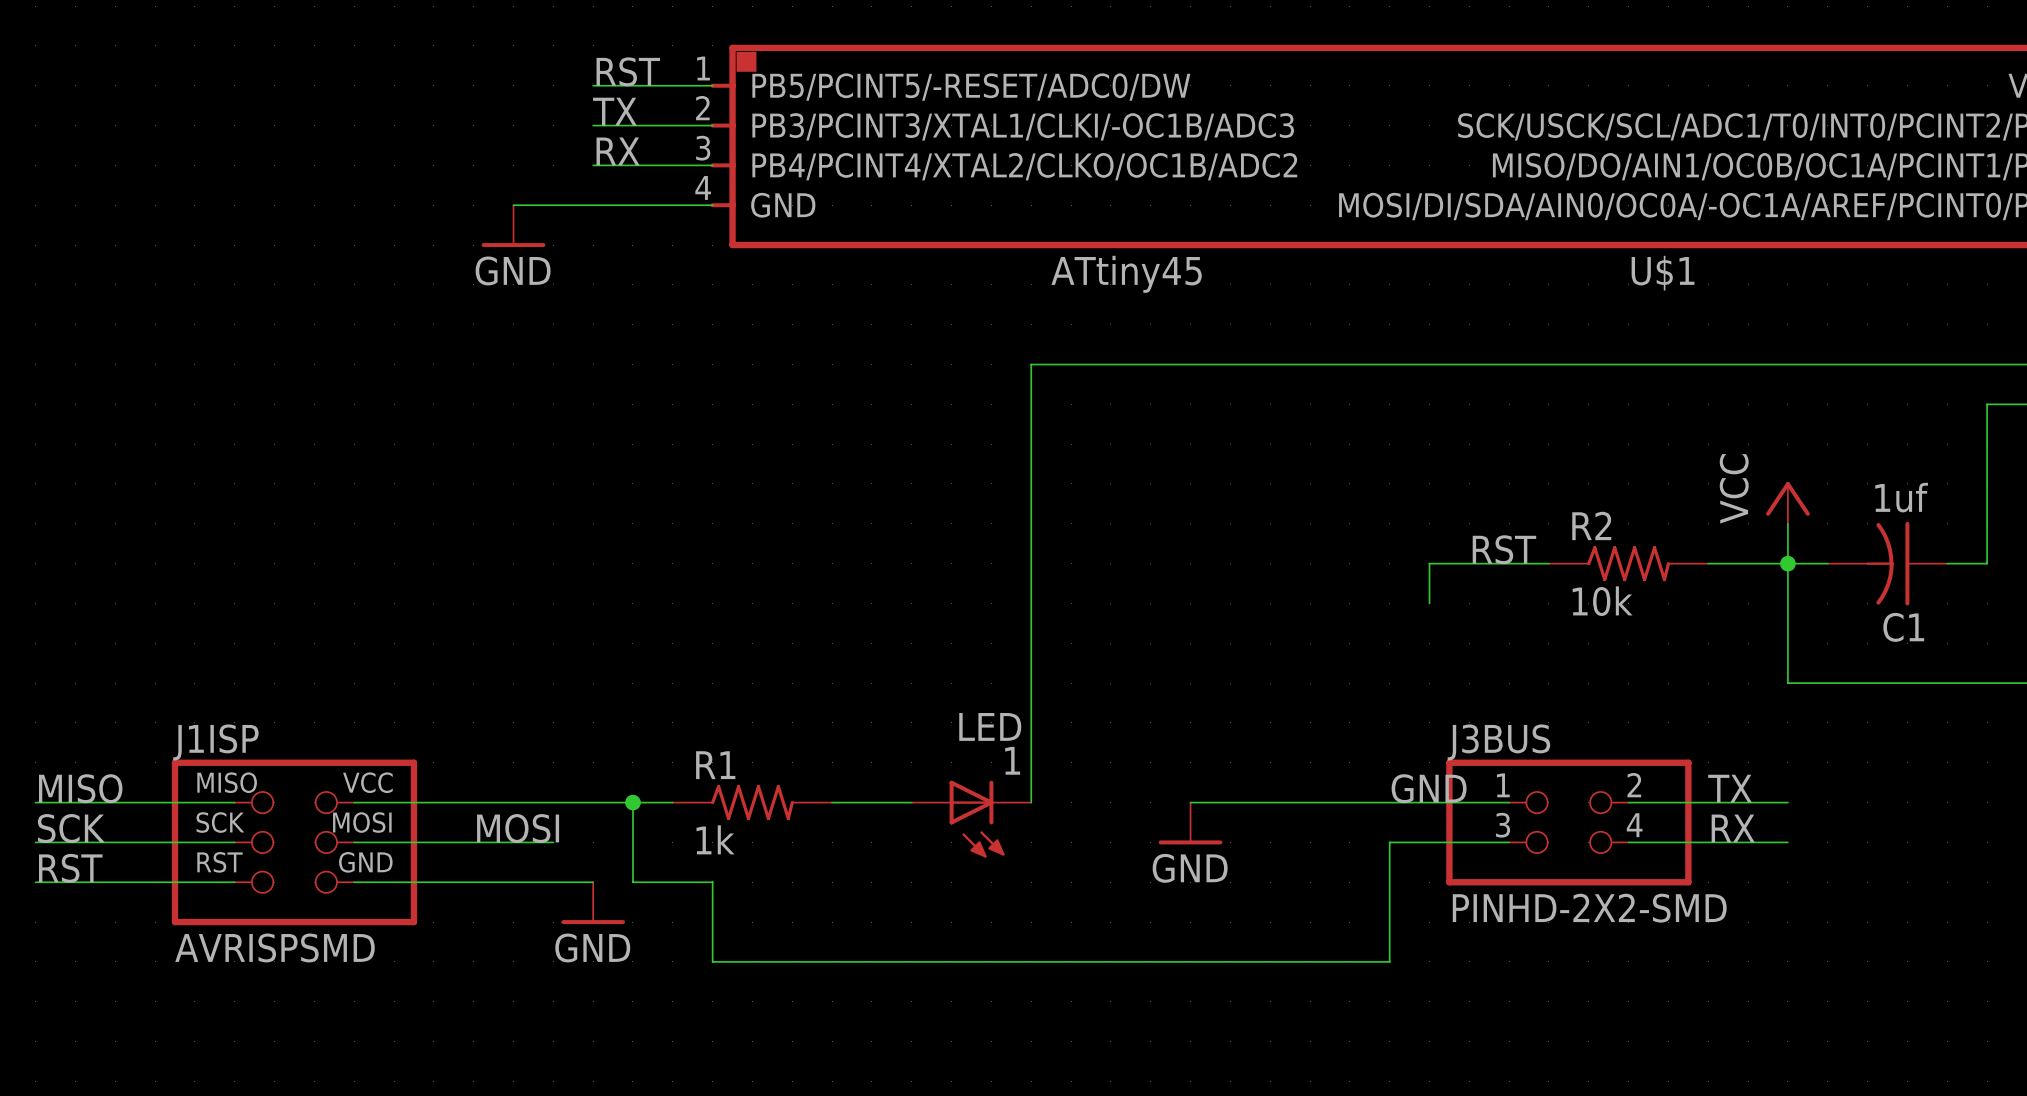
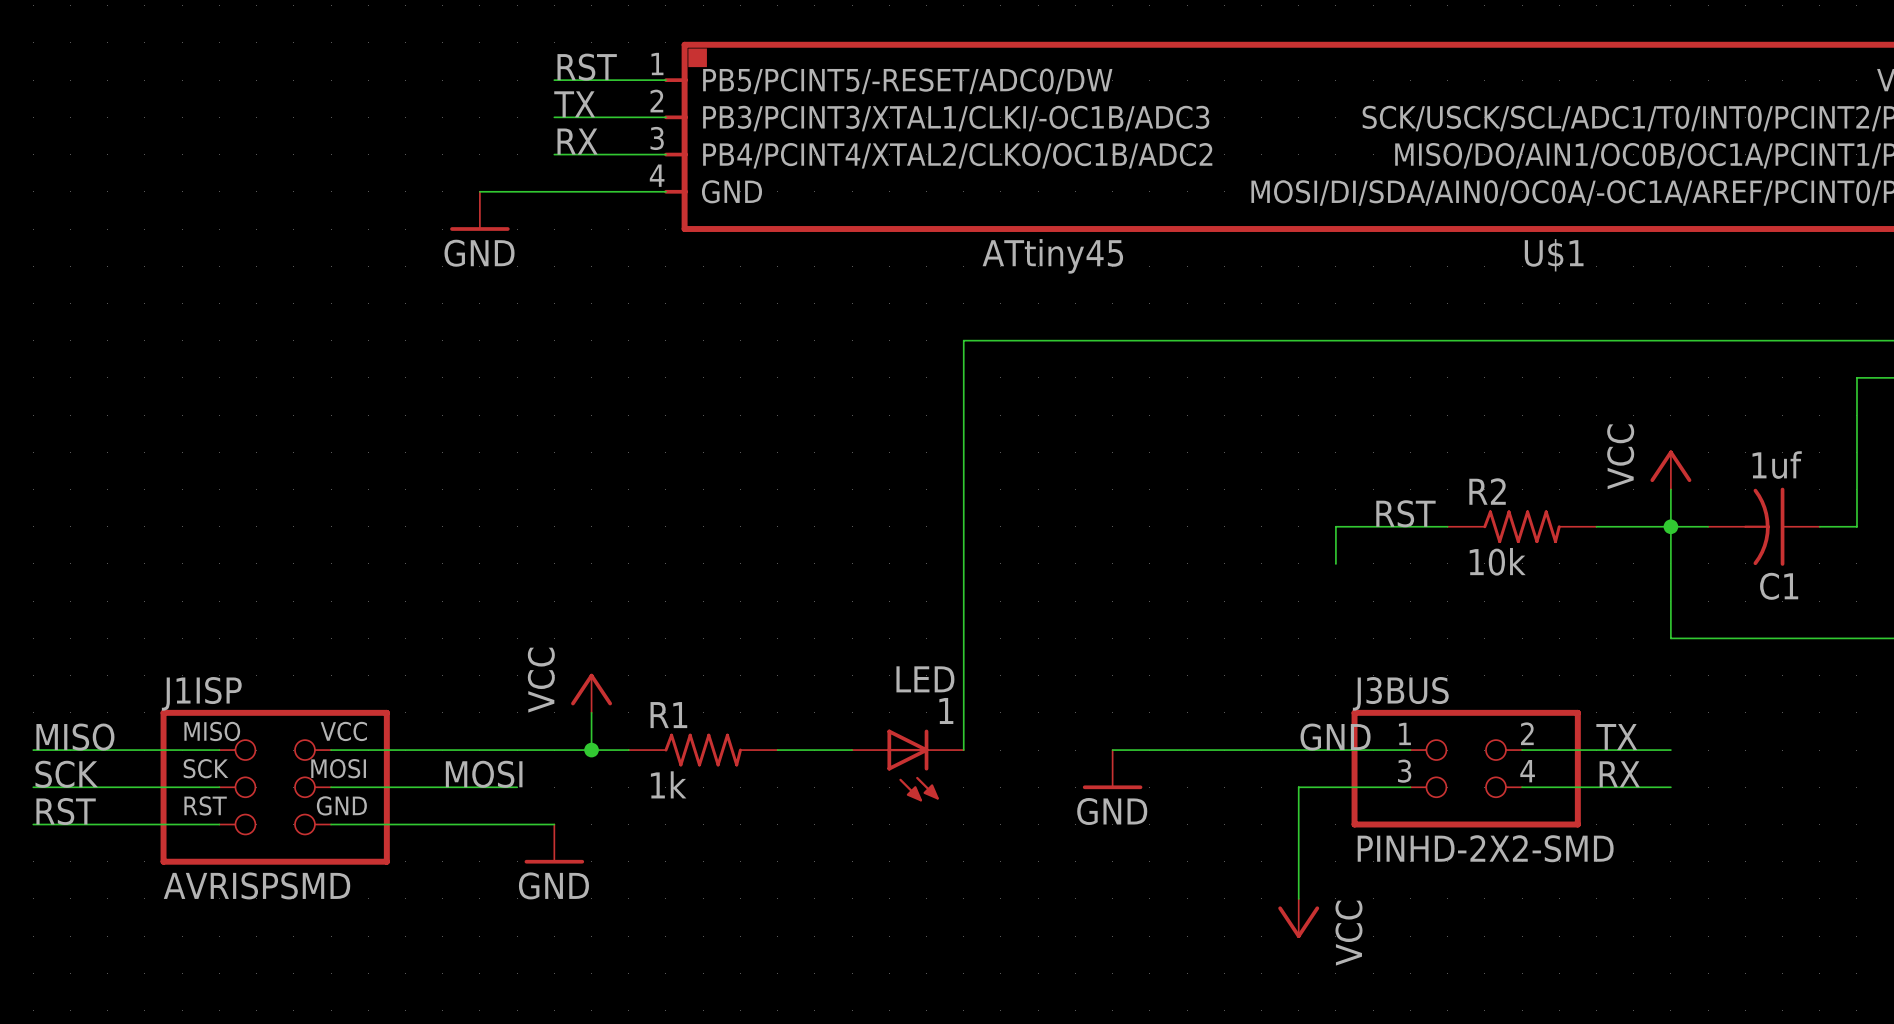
power symbol: none -> VCC (591, 693)
wire: (632, 802) (632, 882) (712, 882) (712, 961) (1389, 961) -> (591, 750) (591, 712)
power symbol: none -> VCC (1298, 918)

